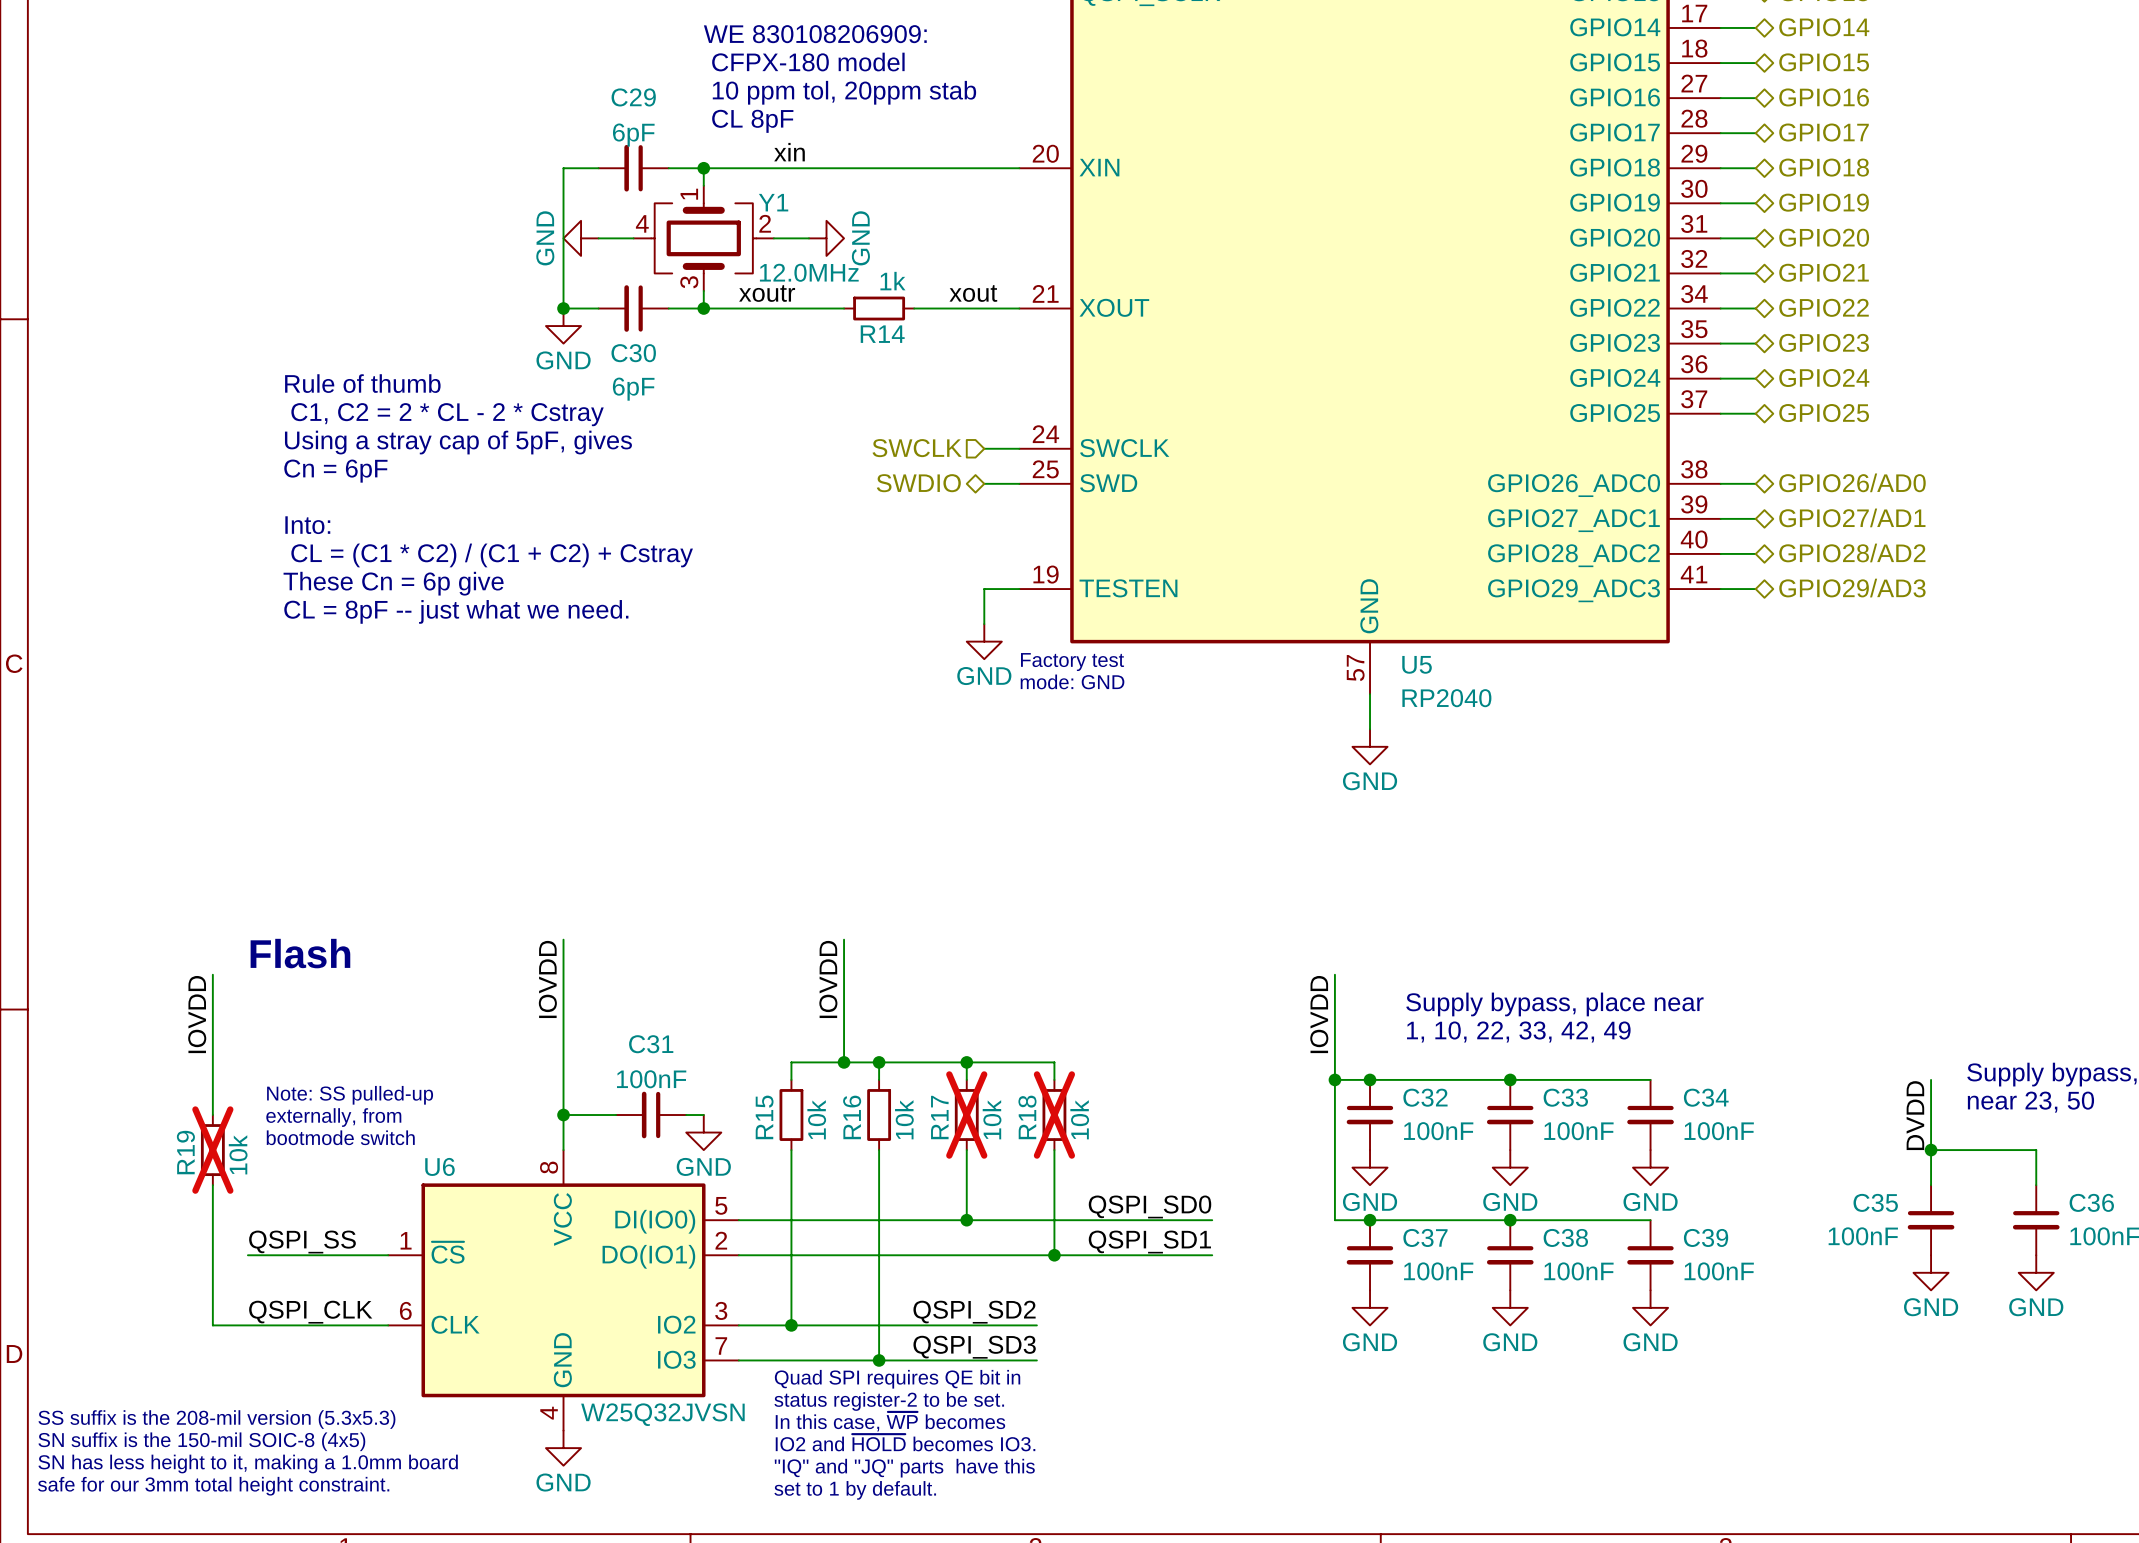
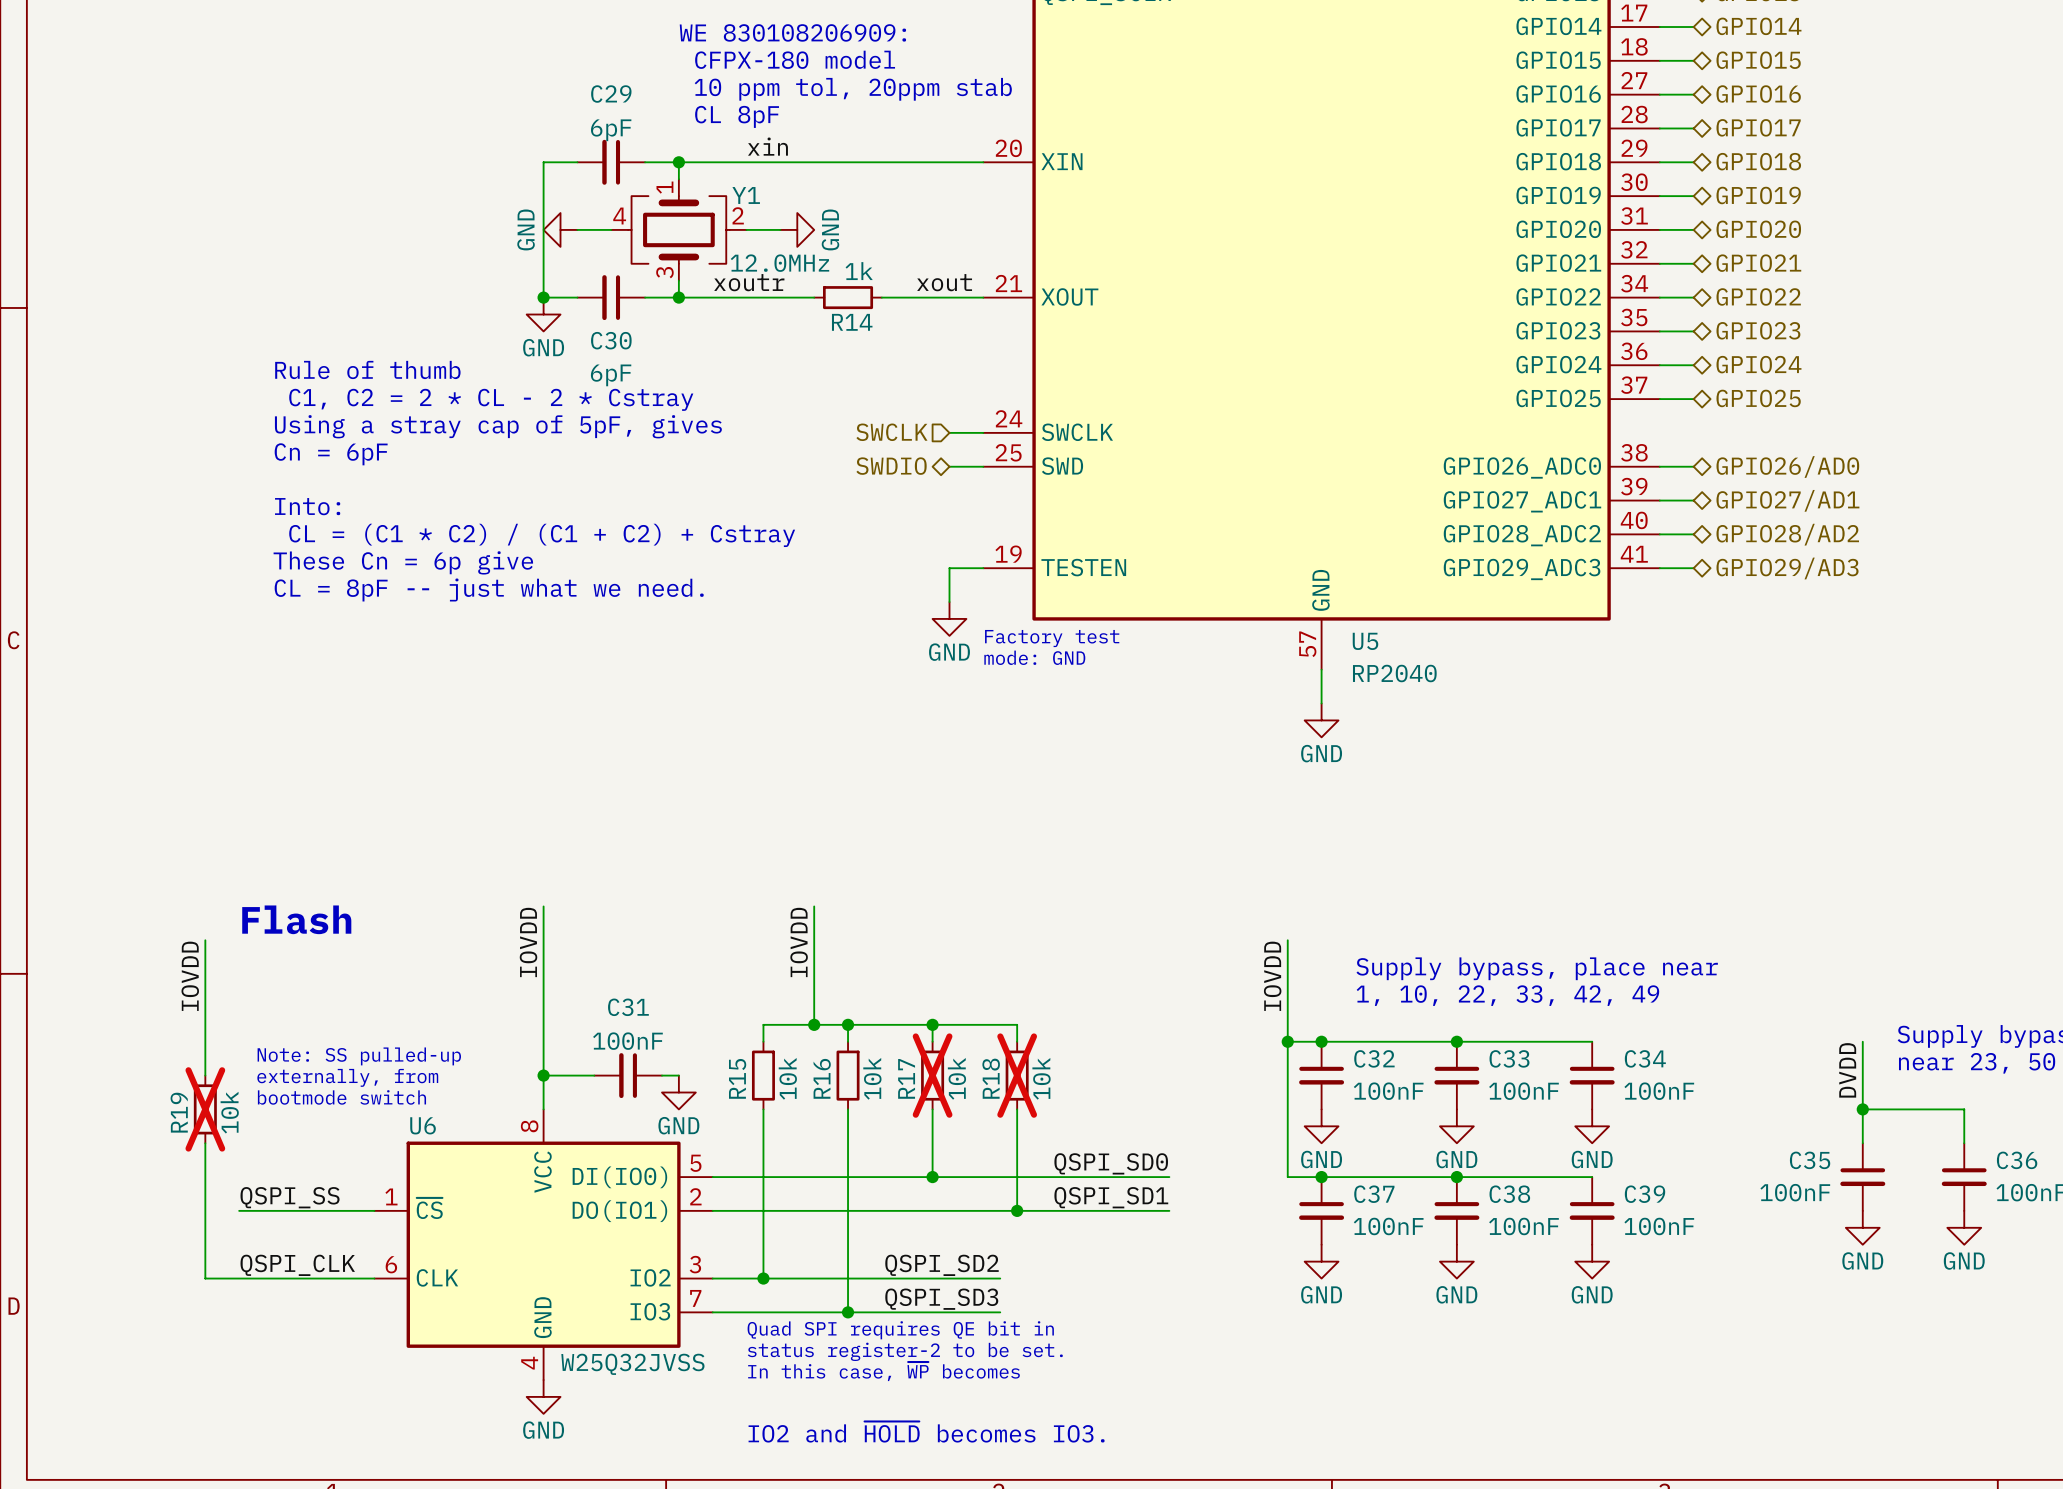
U6 value: W25Q32JVSN (662, 1414) -> W25Q32JVSS (632, 1364)
text: SS suffix is the 208-mil version (5.3x5.3) (216, 1419) -> none
text: SN suffix is the 150-mil SOIC-8 (4x5) (201, 1441) -> none
text: IO2 and ~{HOLD} becomes IO3. (905, 1442) -> none
text: SN has less height to it, making a 1.0mm board (248, 1463) -> none
text: "IQ" and "JQ" parts have this (904, 1468) -> none
text: safe for our 3mm total height constraint. (213, 1486) -> none
text: set to 1 by default. (855, 1490) -> IO2 and ~{HOLD} becomes IO3. (926, 1432)

